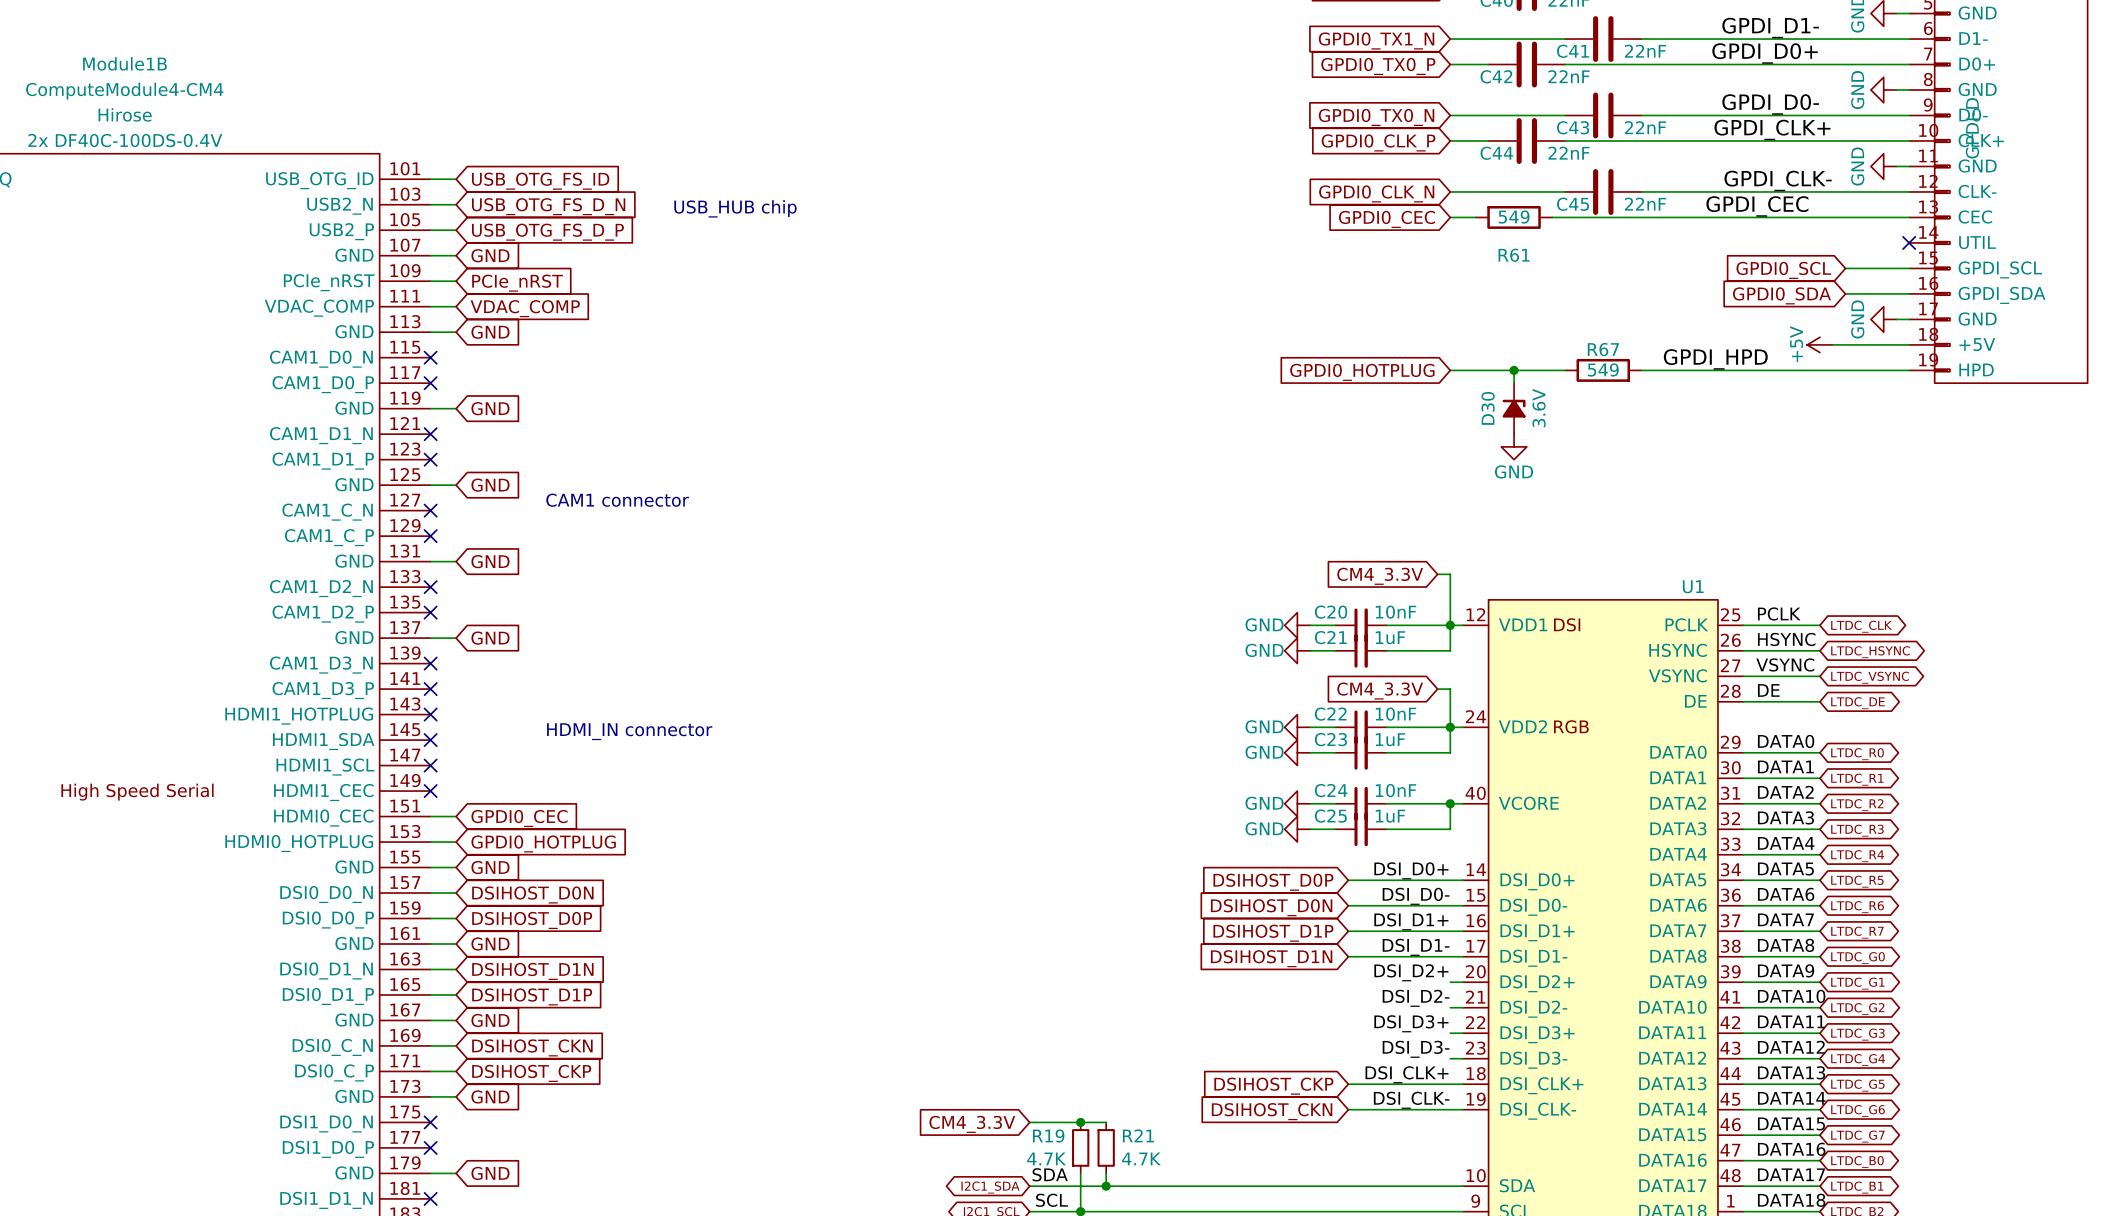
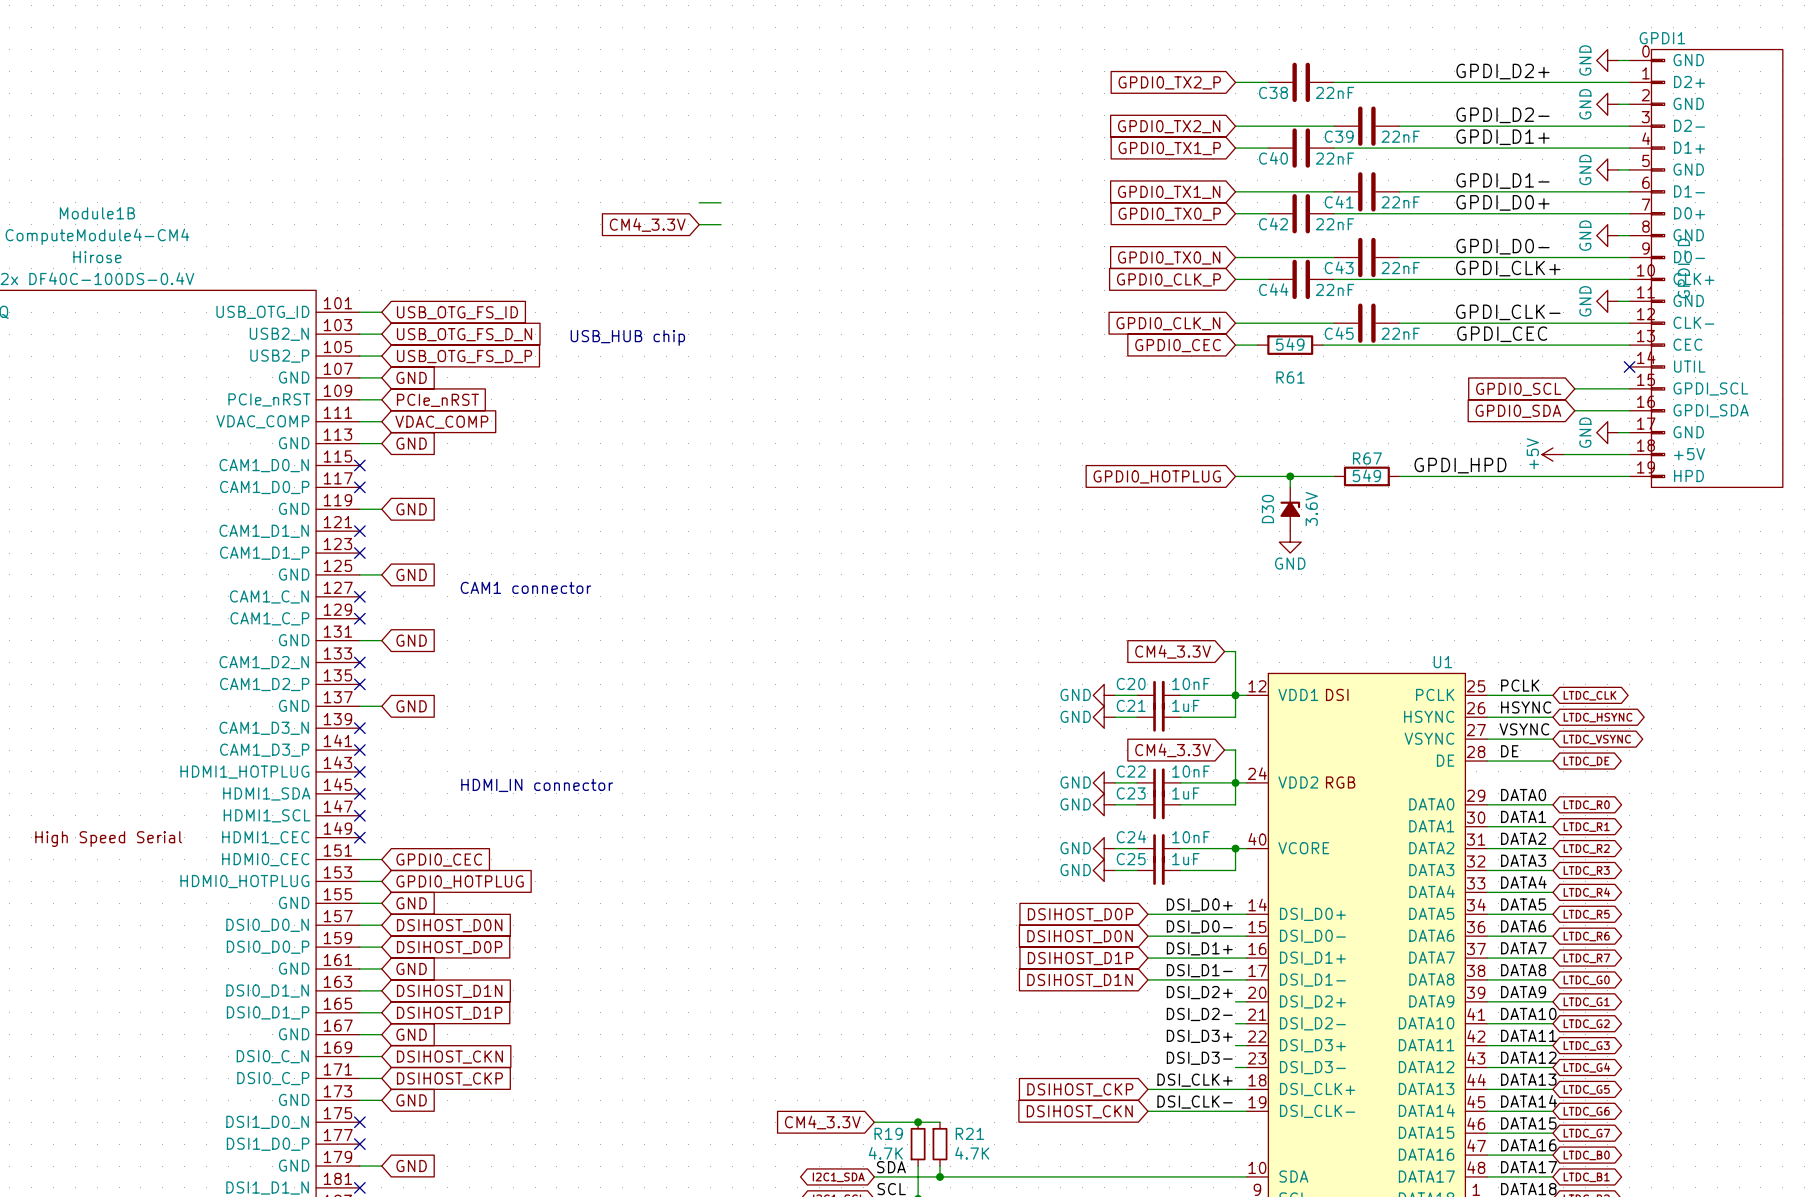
wire: none -> (699, 202) (721, 202)
wire: none -> (699, 224) (721, 224)
global label: none -> CM4_3.3V (647, 224)

